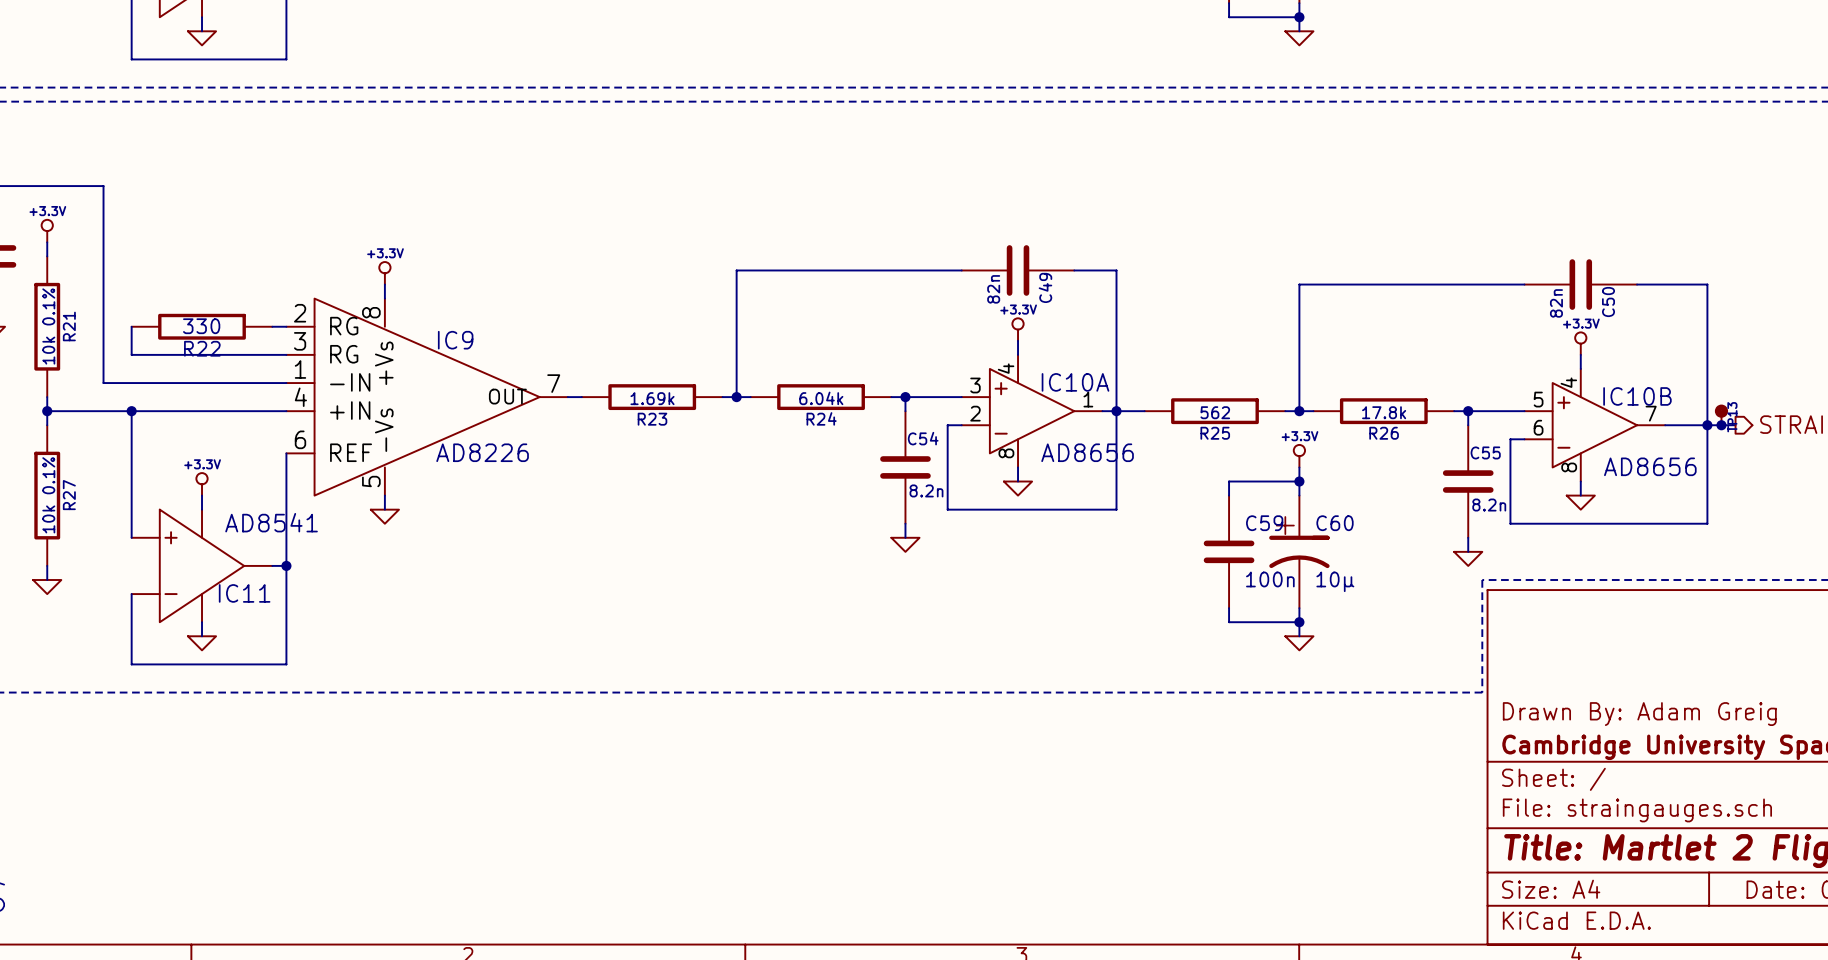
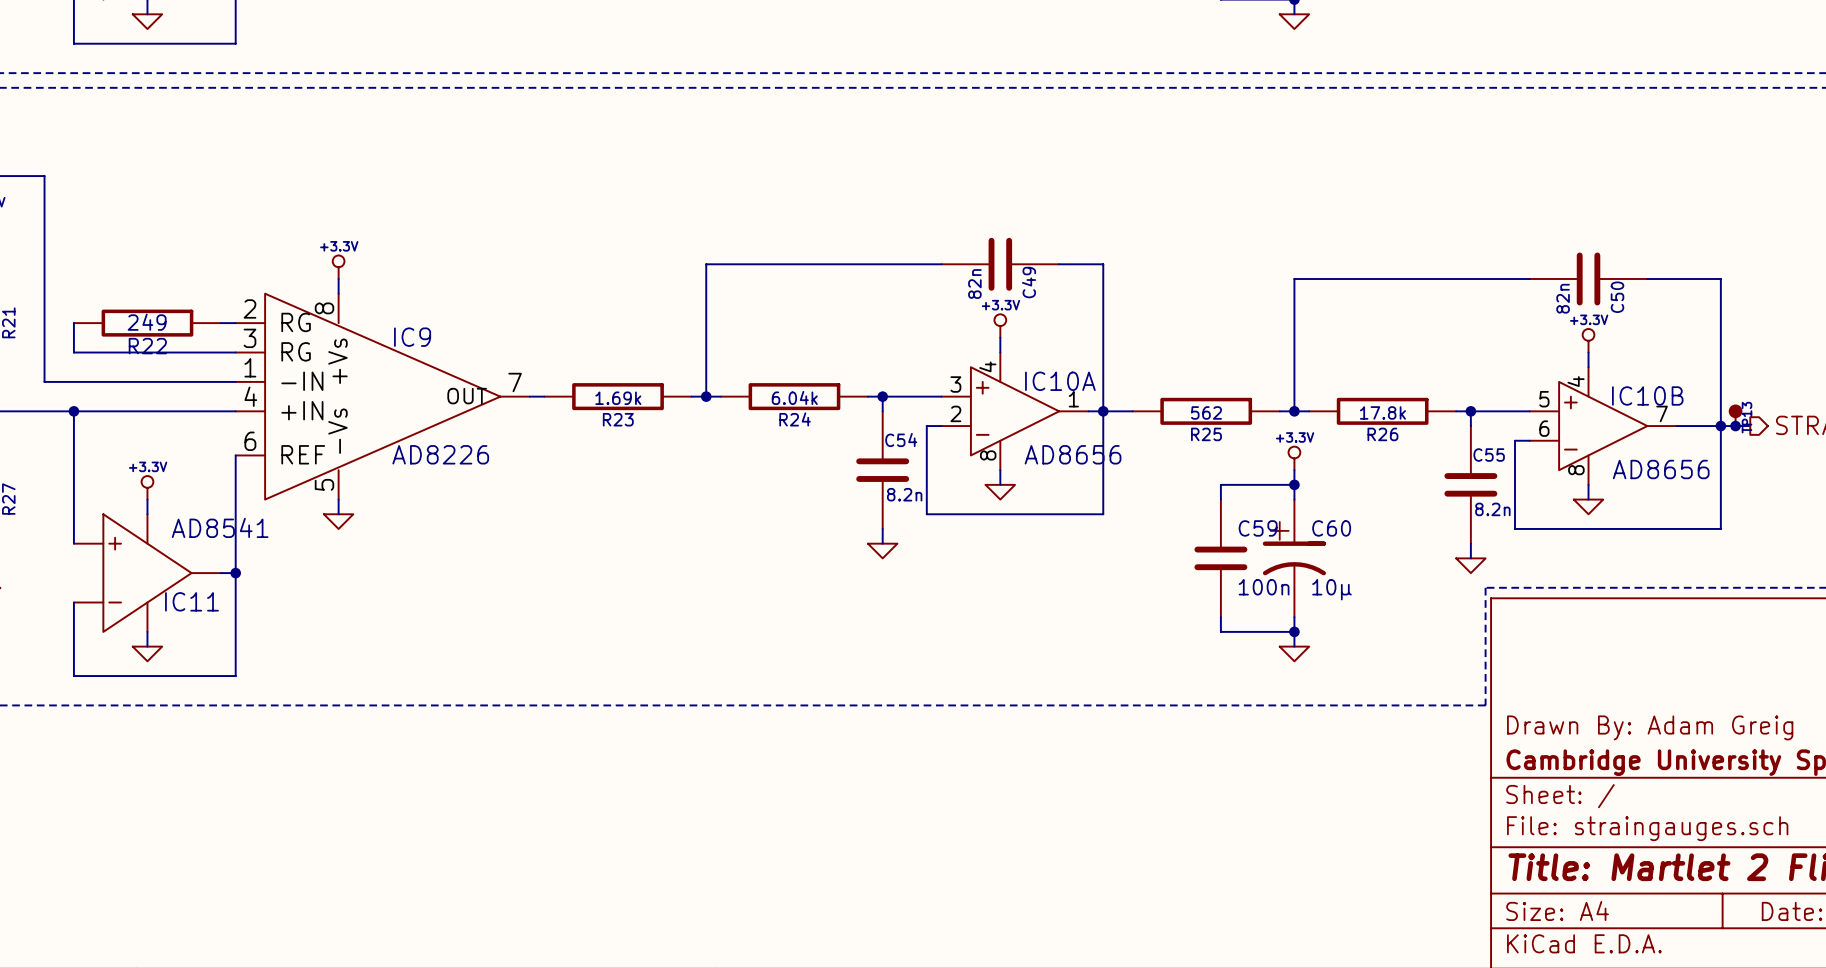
R22 value: 330 (201, 326) -> 249 (147, 322)

